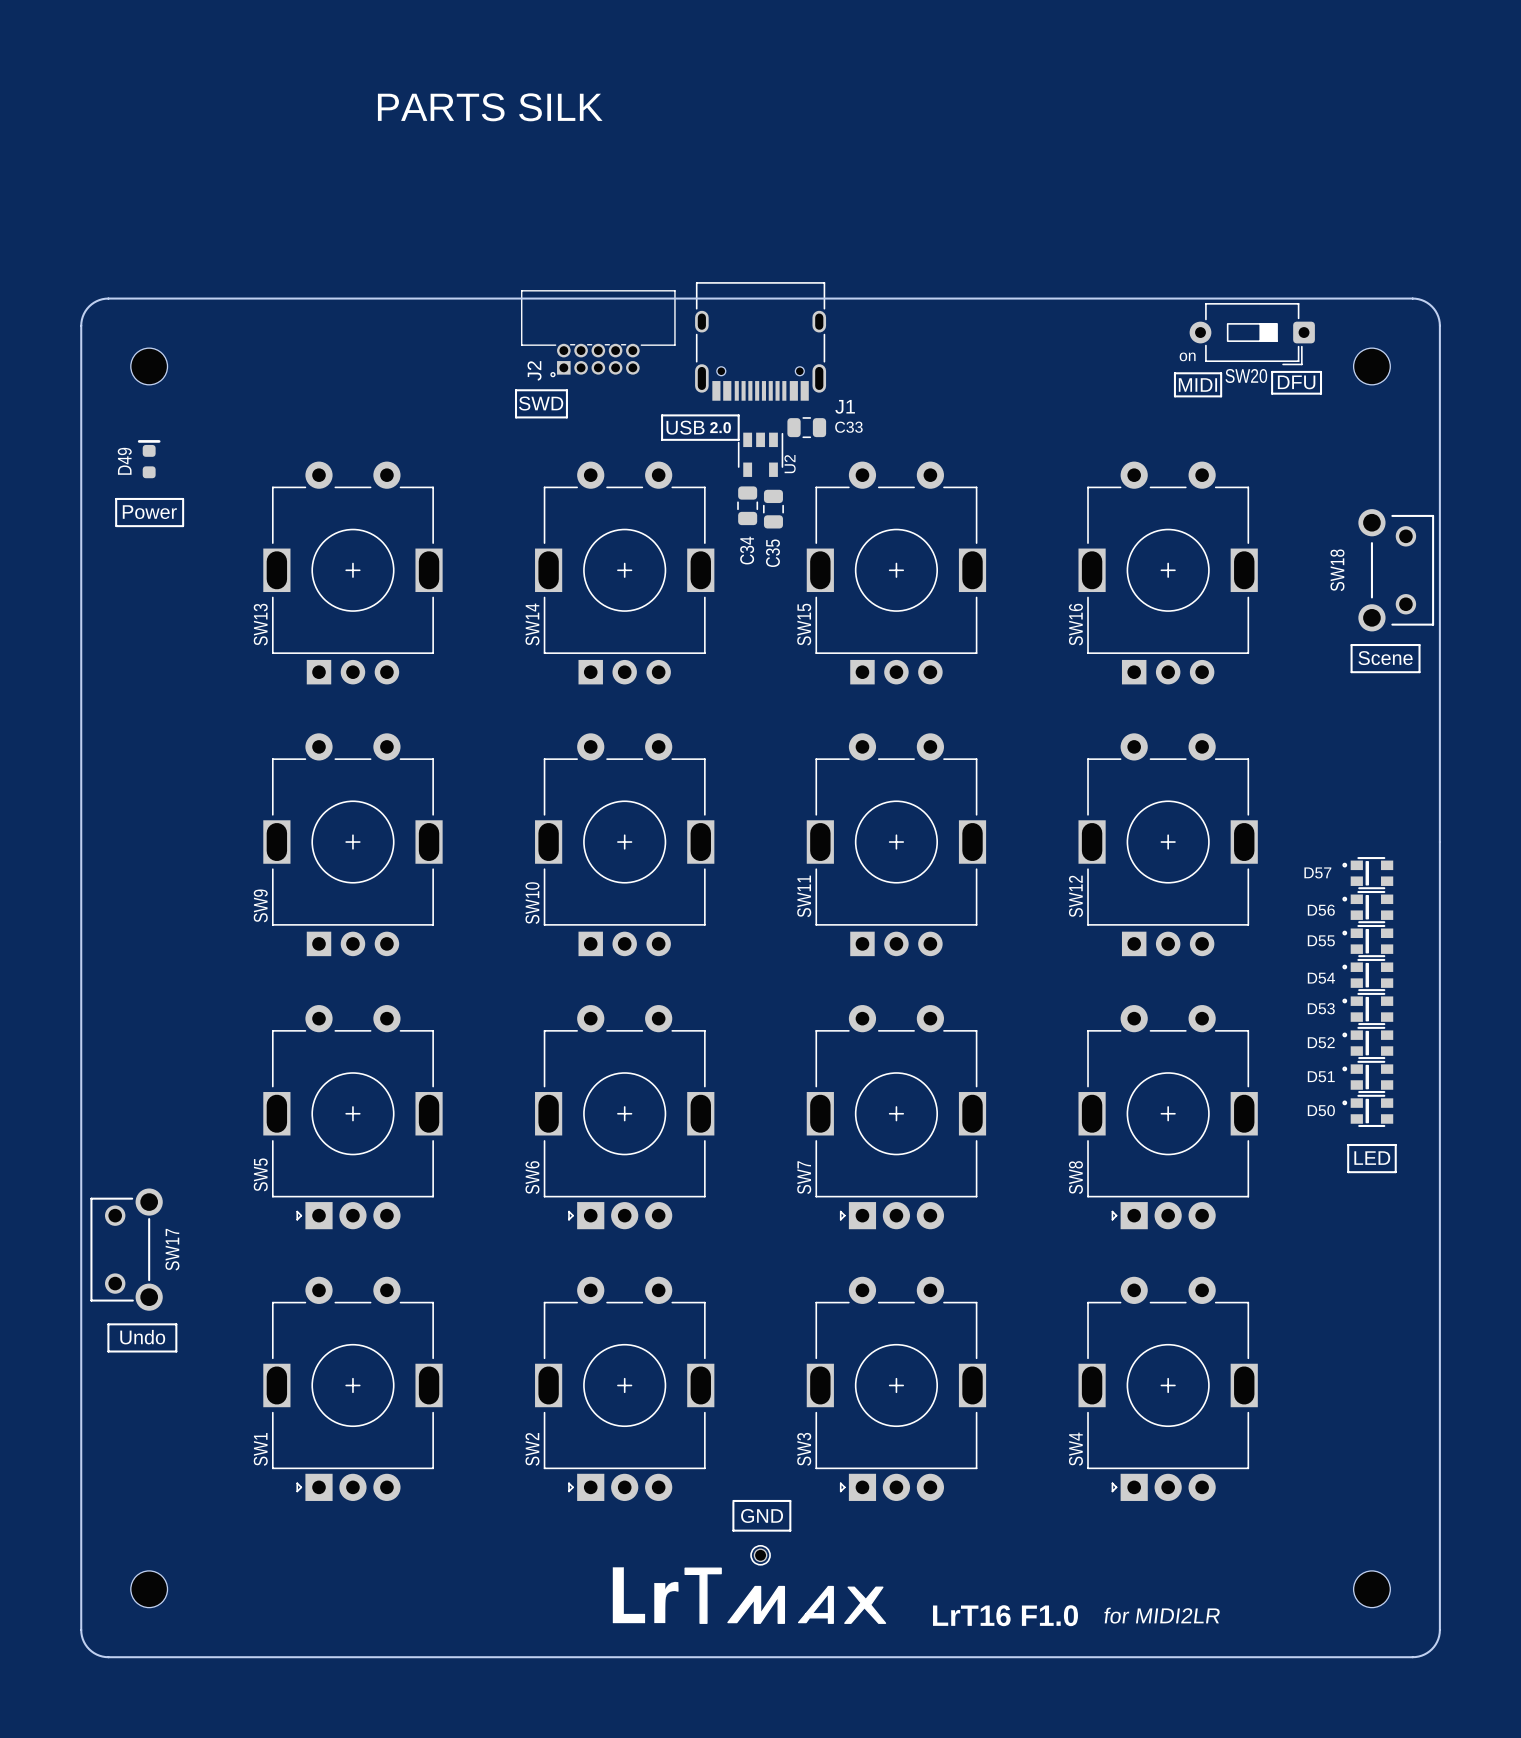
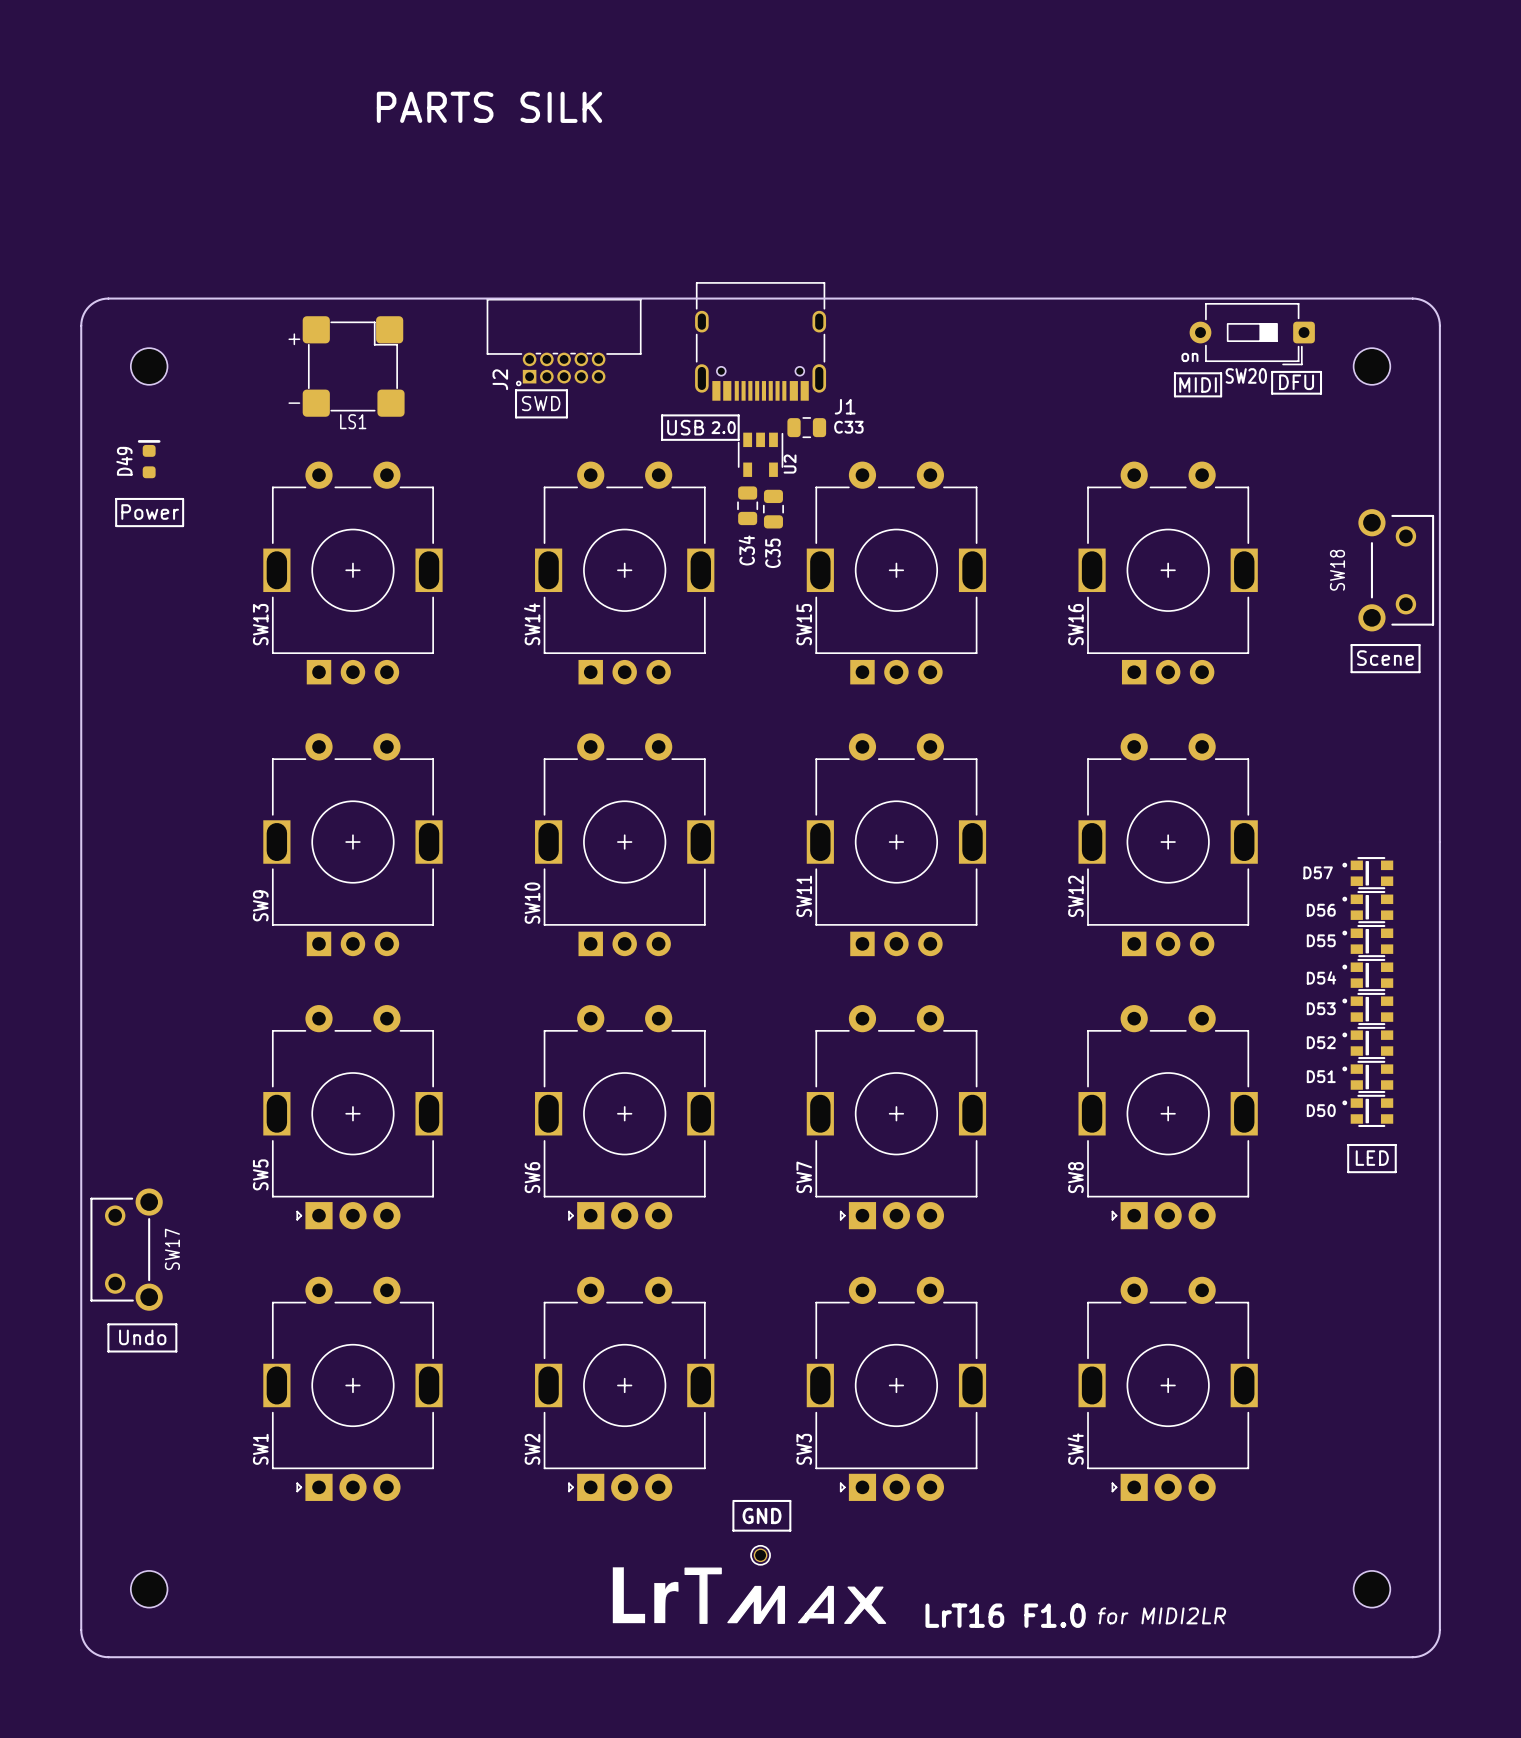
J2 position: (598, 333) -> (564, 342)
LS1: none -> (353, 366)

